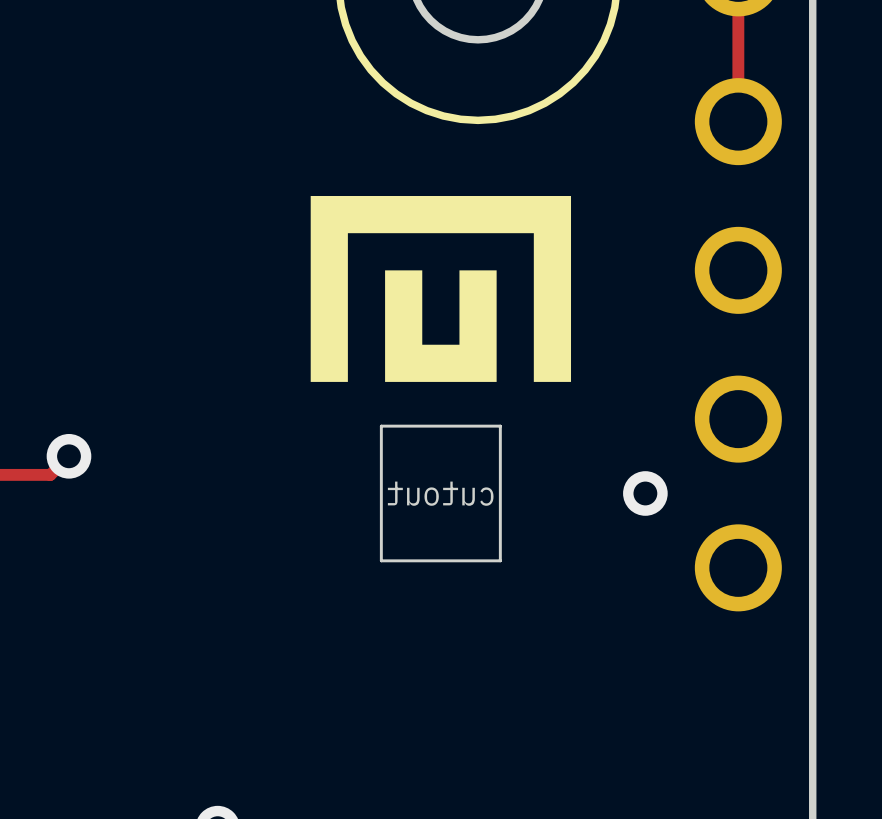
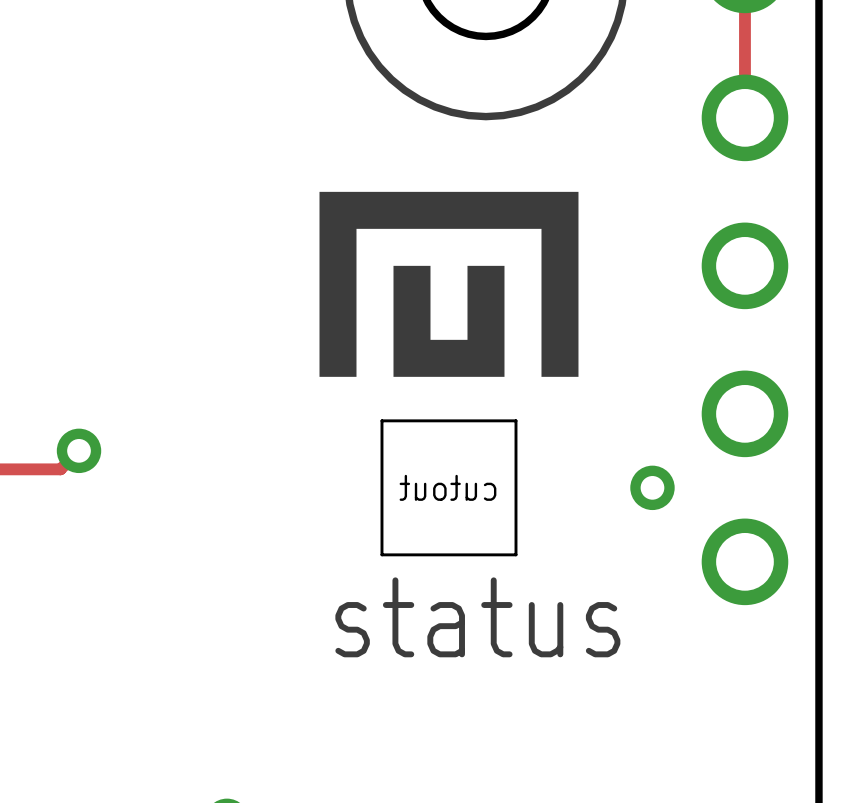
part footprint: [379, 424, 502, 563] -> [380, 419, 518, 557]
text: none -> status (477, 617)

